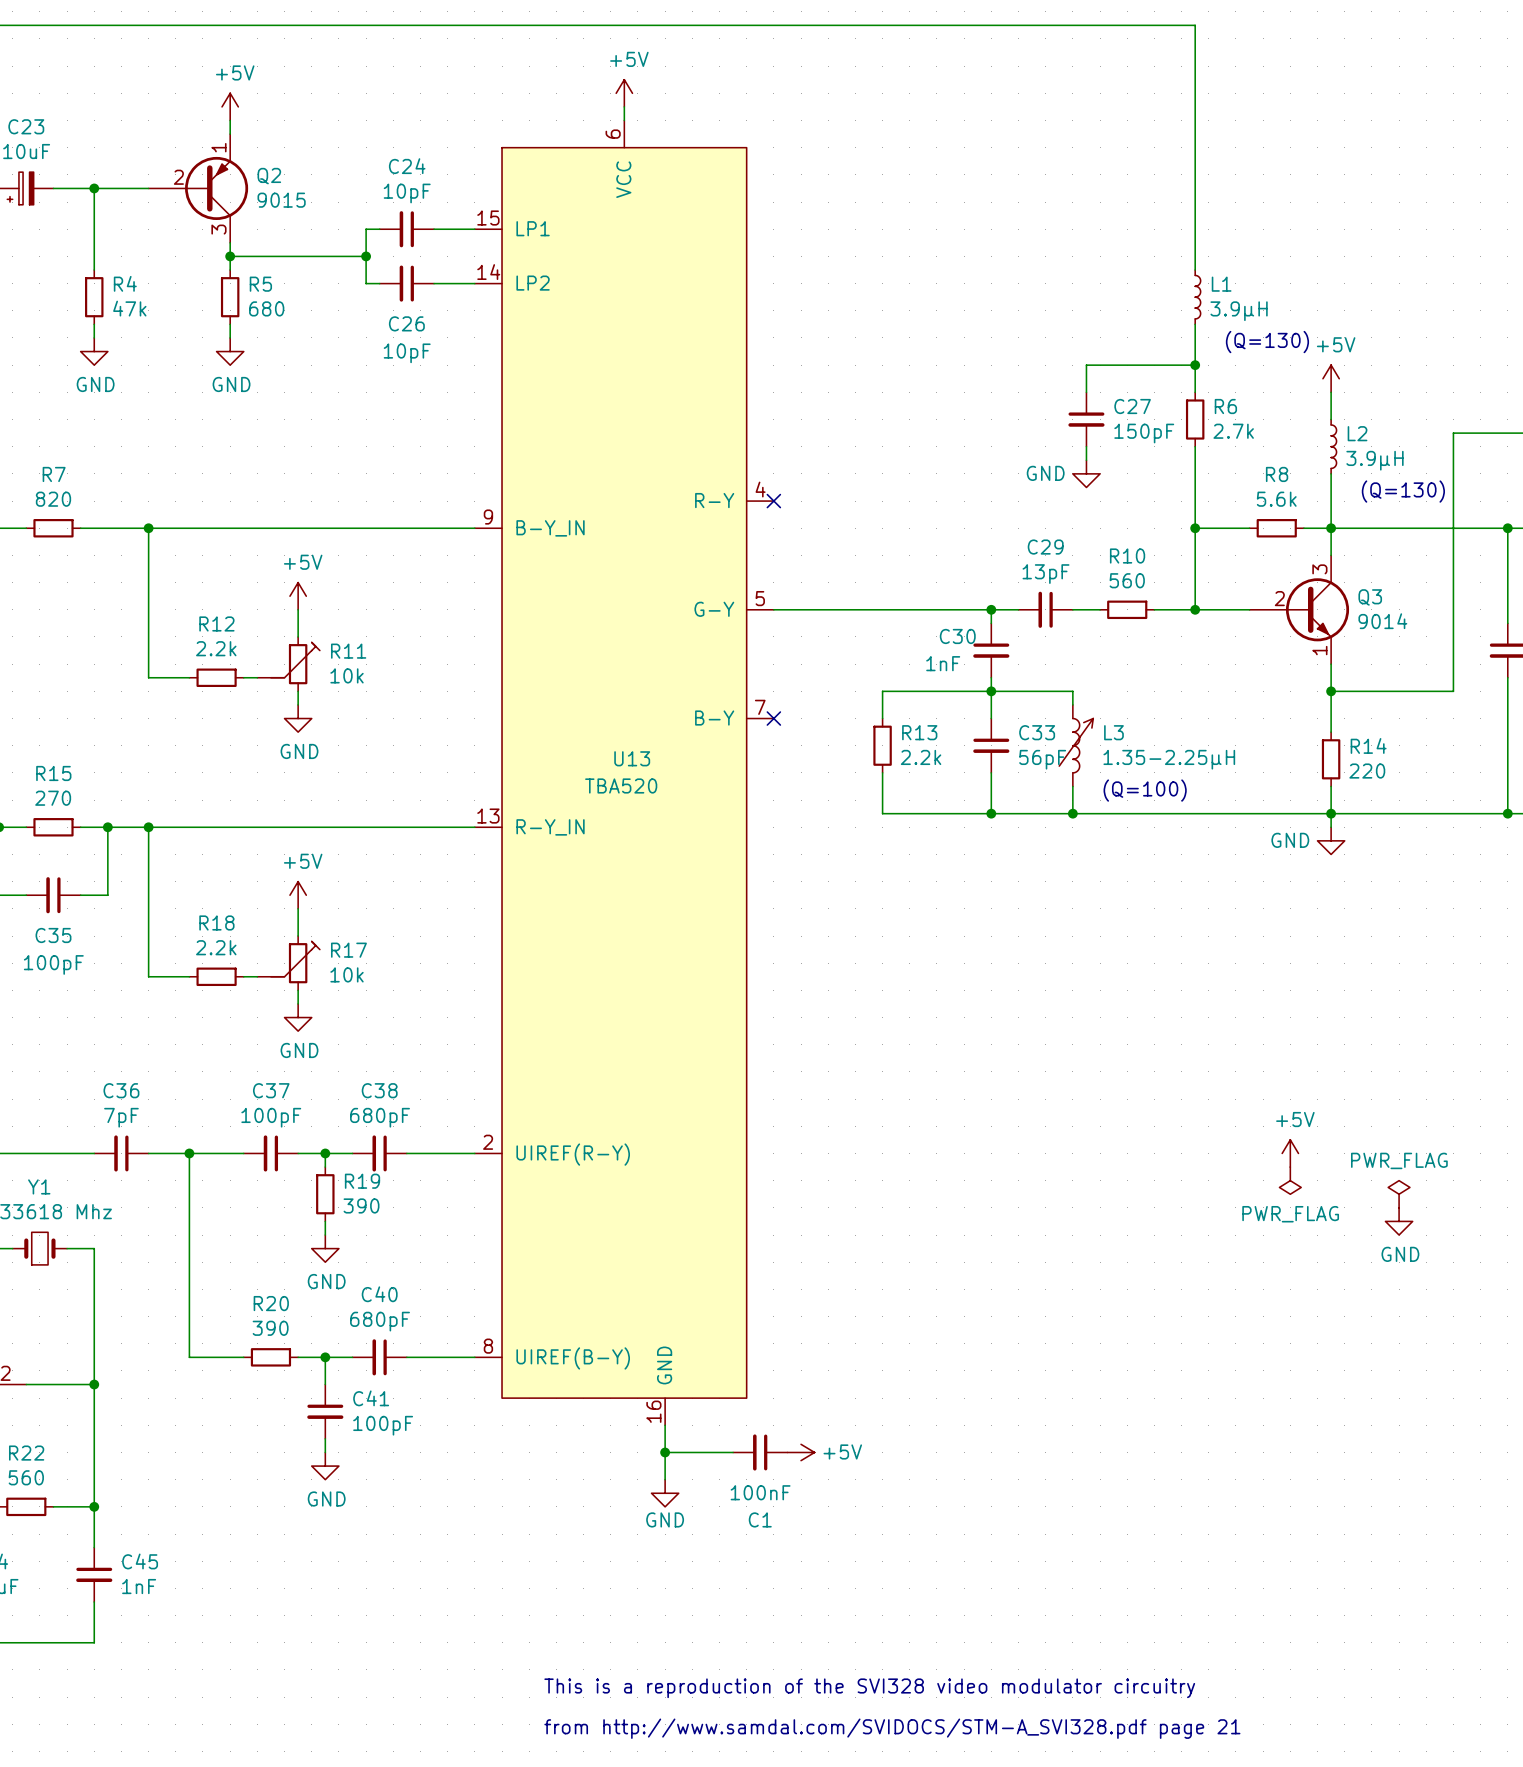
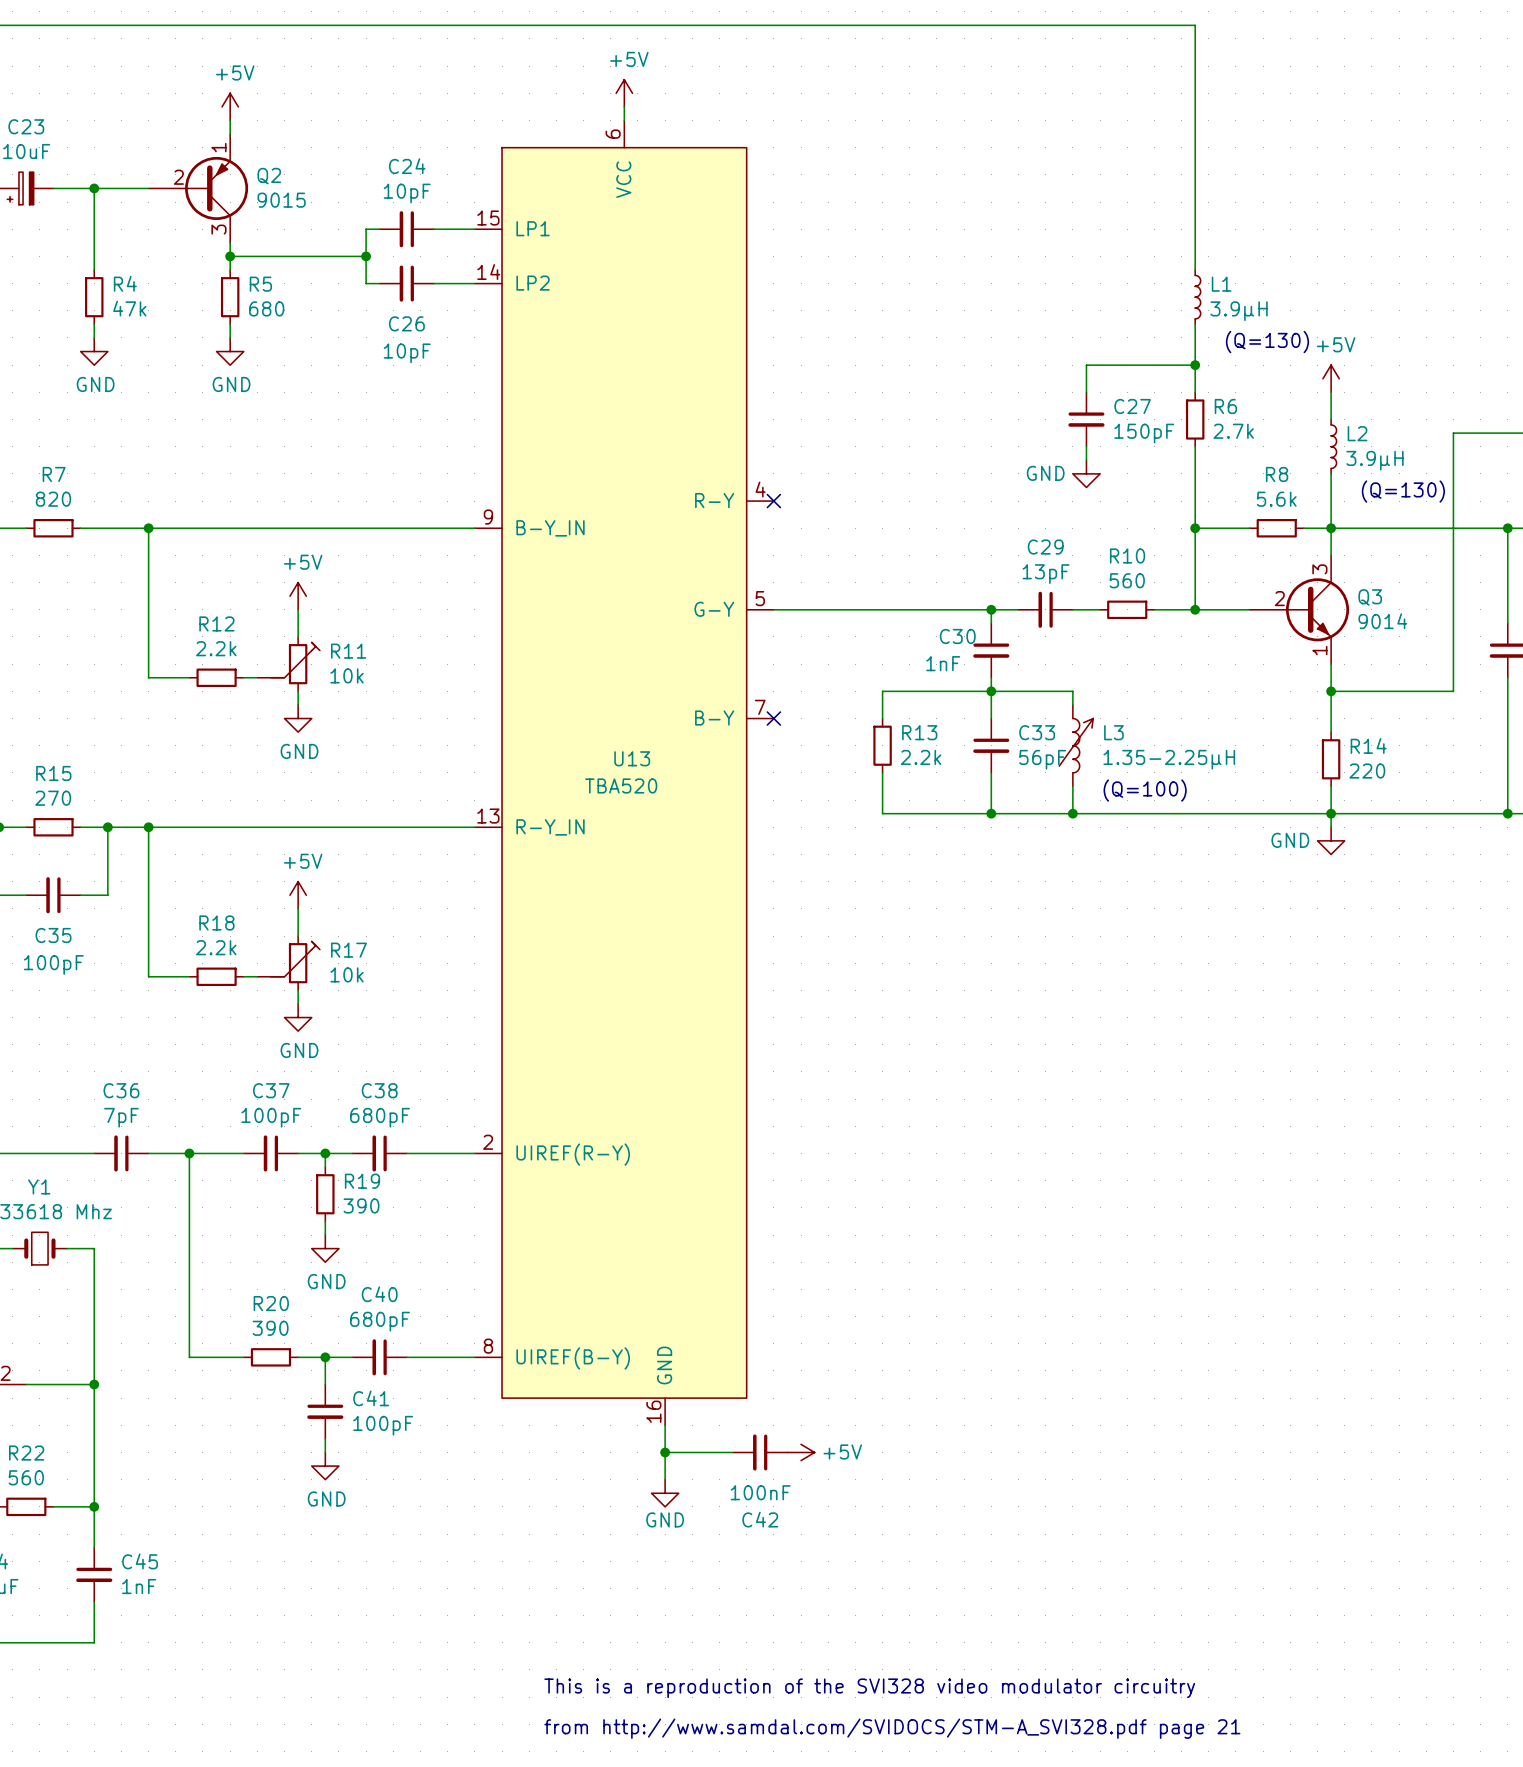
power symbol: +5V (1290, 1153) -> none
power symbol: PWR_FLAG (1290, 1180) -> none
power symbol: PWR_FLAG (1399, 1194) -> none
power symbol: GND (1399, 1221) -> none
C1 name: C1 (760, 1519) -> C42 (760, 1519)

